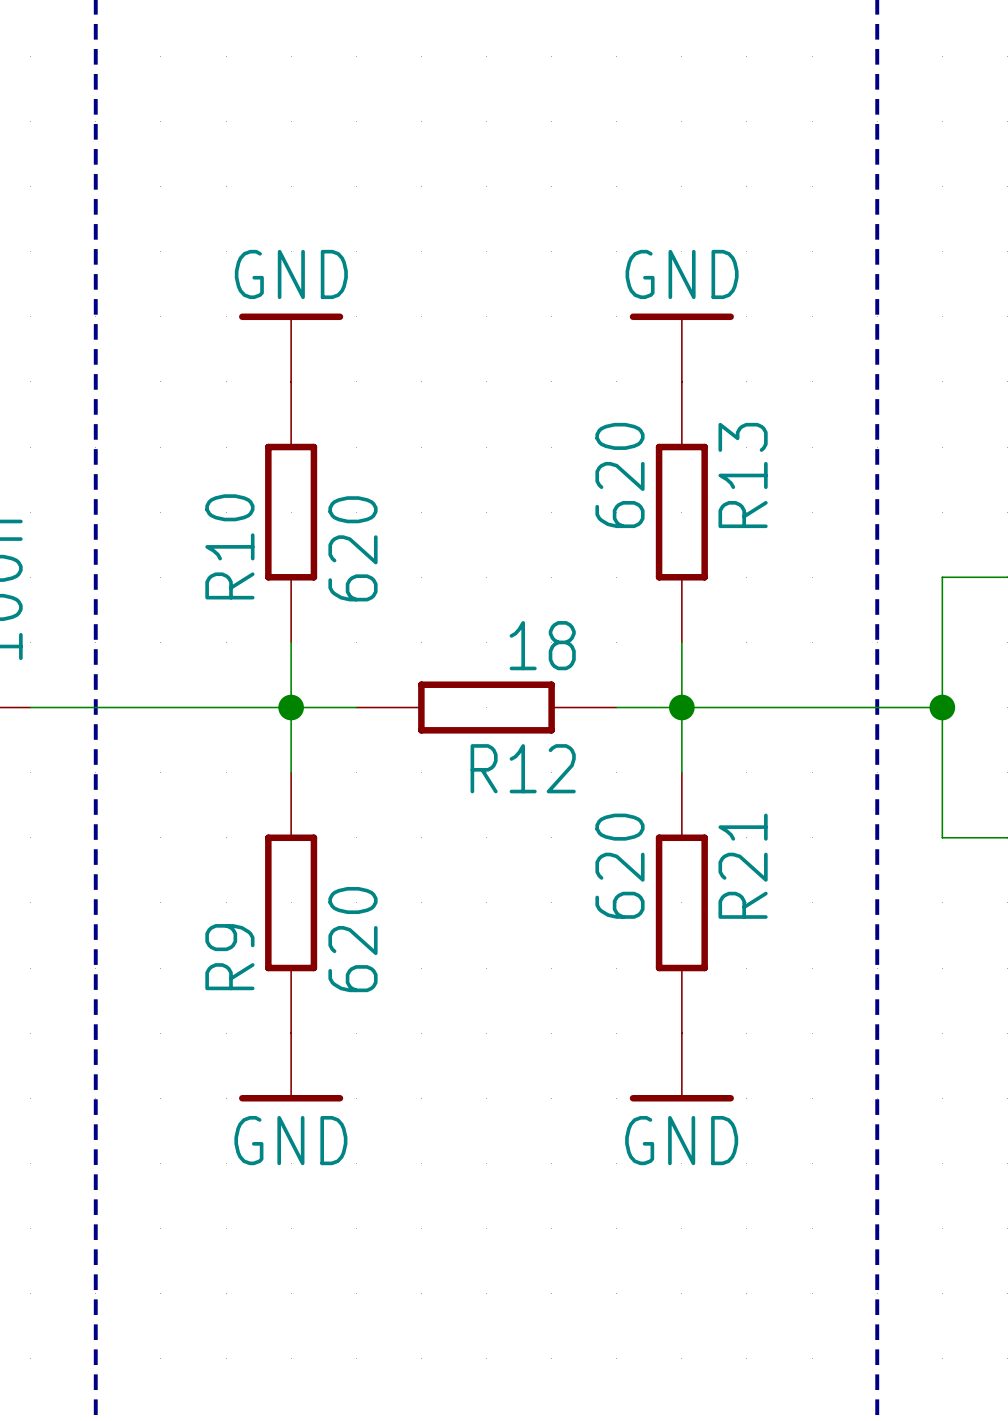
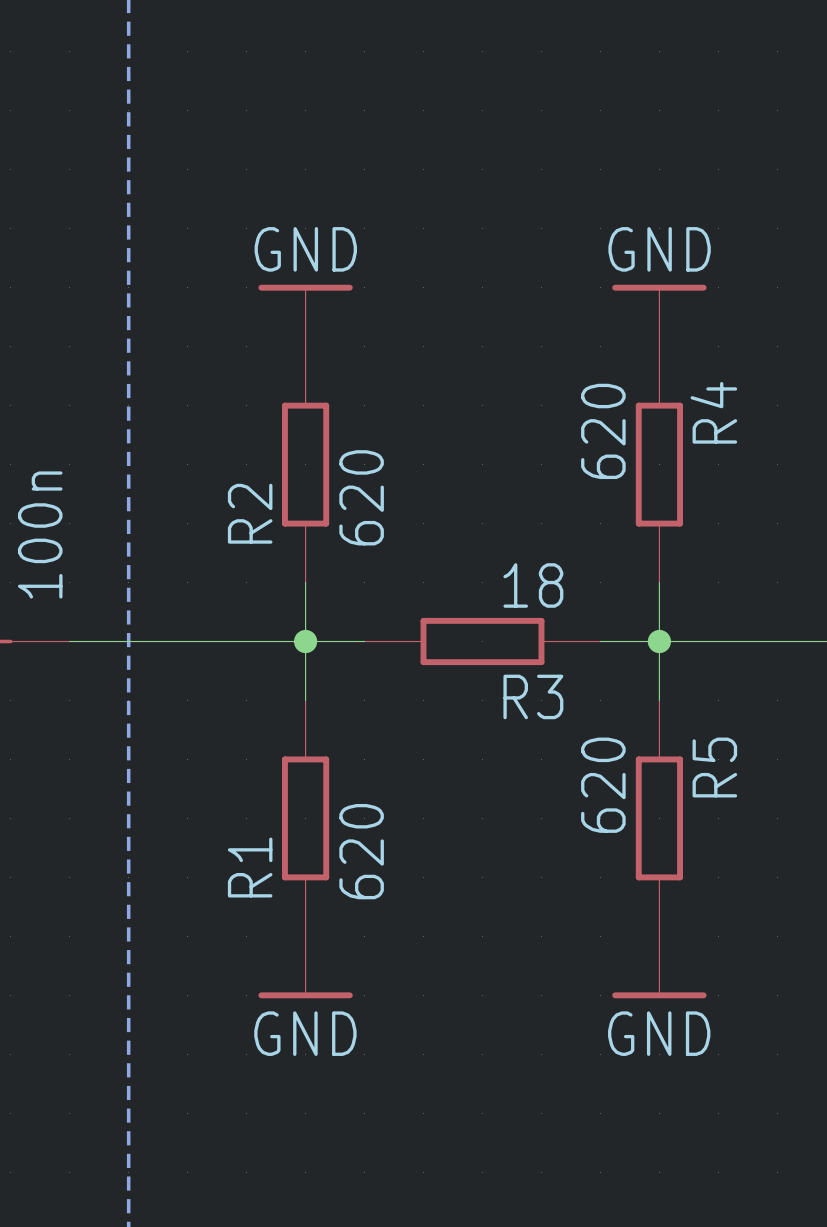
R13 name: R13 (743, 475) -> R4 (713, 412)
R10 name: R10 (229, 546) -> R2 (250, 513)
R12 name: R12 (523, 768) -> R3 (533, 696)
R21 name: R21 (743, 866) -> R5 (714, 767)
R9 name: R9 (229, 957) -> R1 (250, 867)

